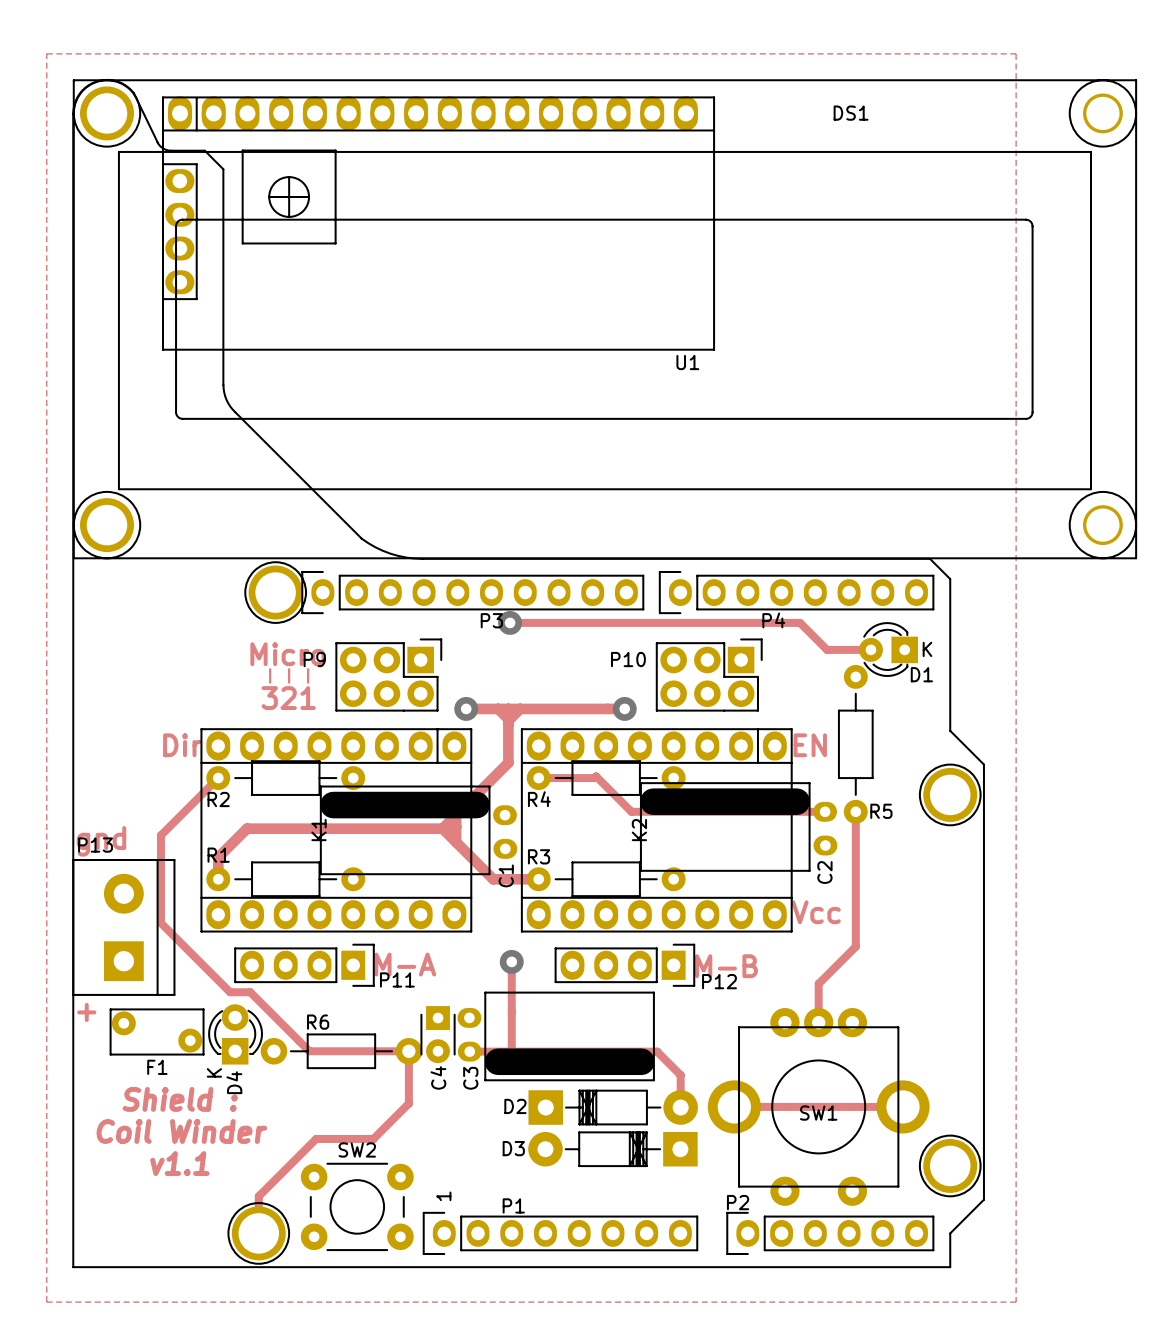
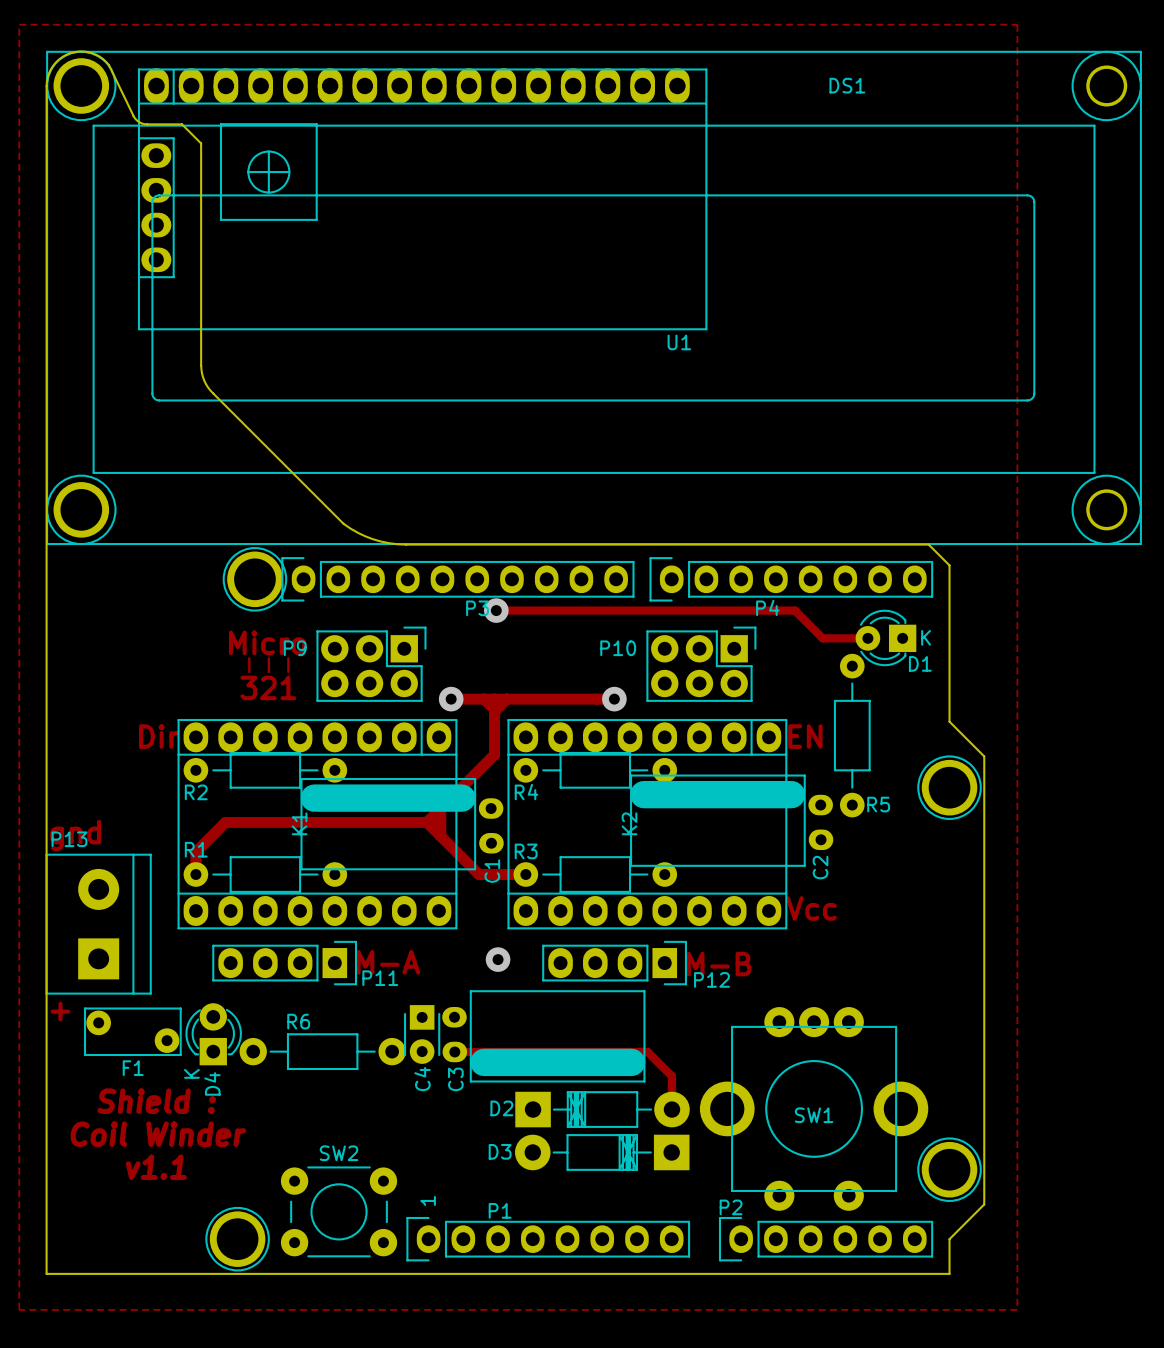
track: (218, 778) (160, 835) (160, 923) (230, 992) (250, 992) (309, 1051) (408, 1051) (408, 1103) (373, 1138) (316, 1138) (258, 1196) (258, 1233) -> none
track: (538, 778) (594, 778) (596, 776) (631, 811) (825, 811) -> none
track: (855, 811) (855, 946) (818, 983) (818, 1022) -> none
track: (511, 961) (511, 1051) -> none
track: (734, 1106) (903, 1106) -> none

